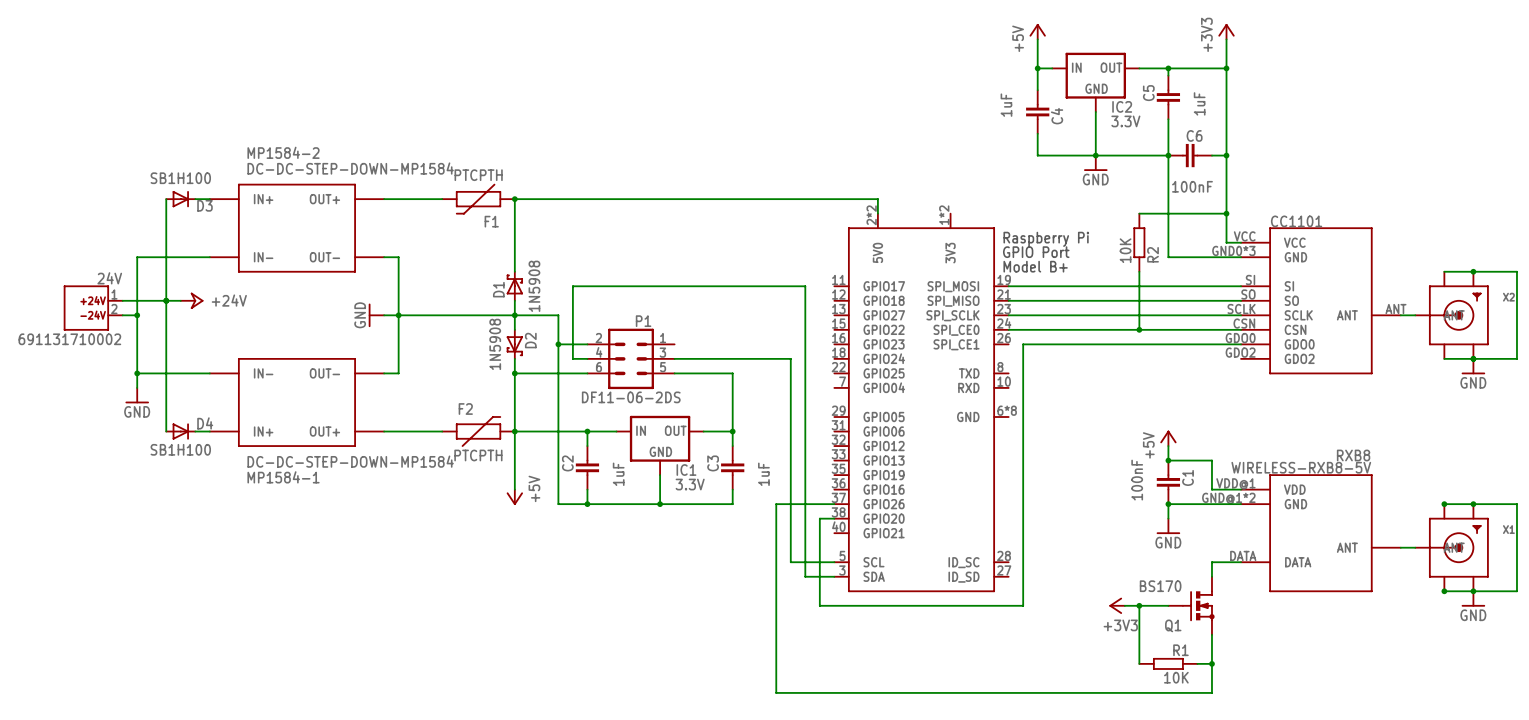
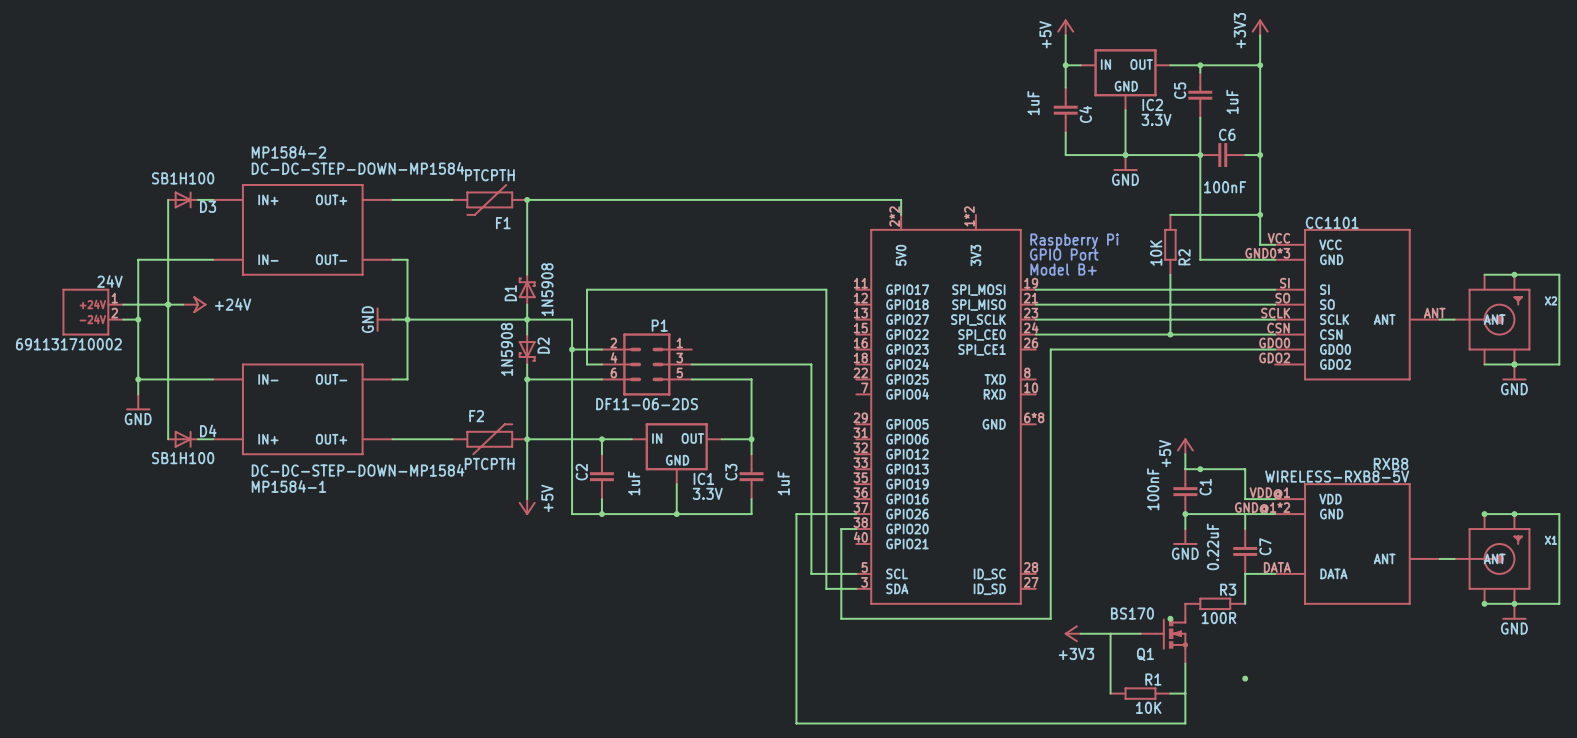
power symbol position: +5V (1168, 438) -> +5V (1185, 446)
wire: (1168, 446) (1168, 460) -> (1185, 454) (1185, 469) (1200, 469)
C1 position: (1168, 482) -> (1185, 491)
wire: (1168, 504) (1168, 518) -> (1200, 514) (1185, 514) (1185, 529)
junction position: (1168, 504) -> (1185, 514)
wire: none -> (1245, 514) (1245, 529)
power symbol position: GND (1168, 526) -> GND (1185, 536)
C7: none -> 0.22uF (1245, 551)
R3: none -> 100R (1215, 603)
power symbol position: +3V3 (1117, 605) -> +3V3 (1072, 633)
wire: (1124, 605) (1168, 605) -> none
wire: (1139, 605) (1139, 663) -> (1110, 633) (1110, 693)
Q1 position: (1191, 605) -> (1164, 633)
wire: none -> (1080, 633) (1140, 633)
wire: (1211, 634) (1211, 692) (776, 692) -> (1185, 663) (1185, 723) (796, 723) (796, 708)
R1 position: (1168, 663) -> (1140, 693)
wire: (1197, 663) (1211, 663) -> (1170, 693) (1185, 693)

